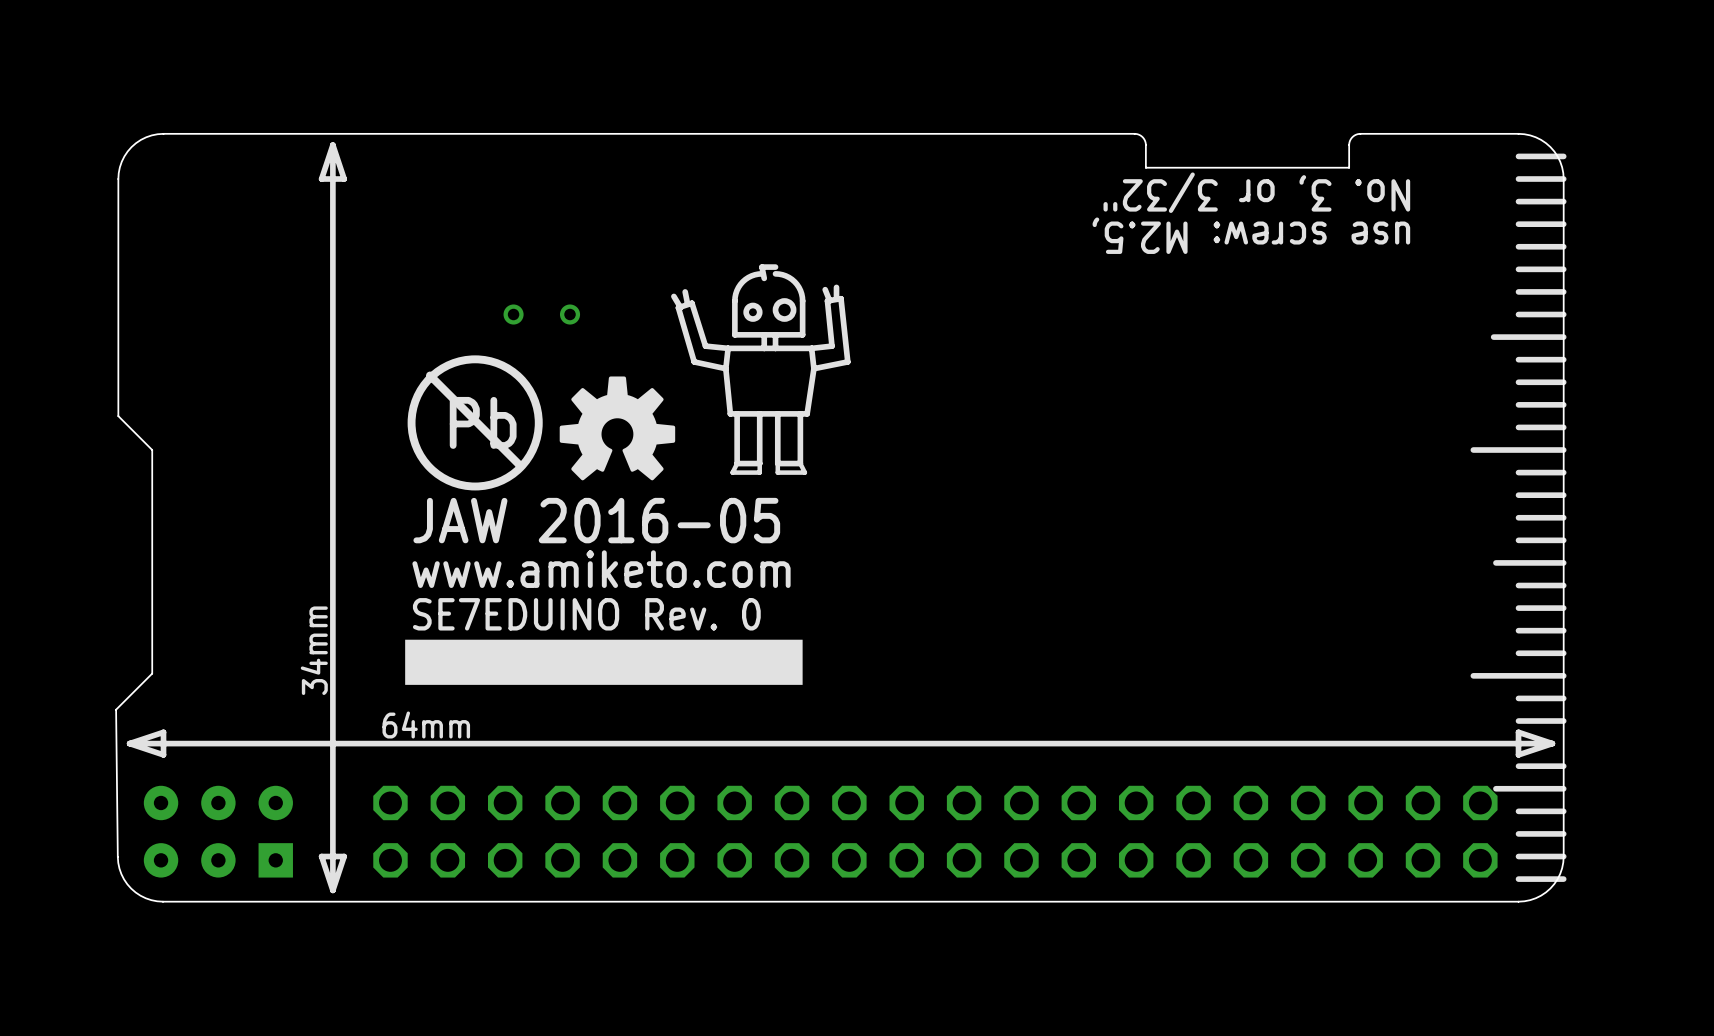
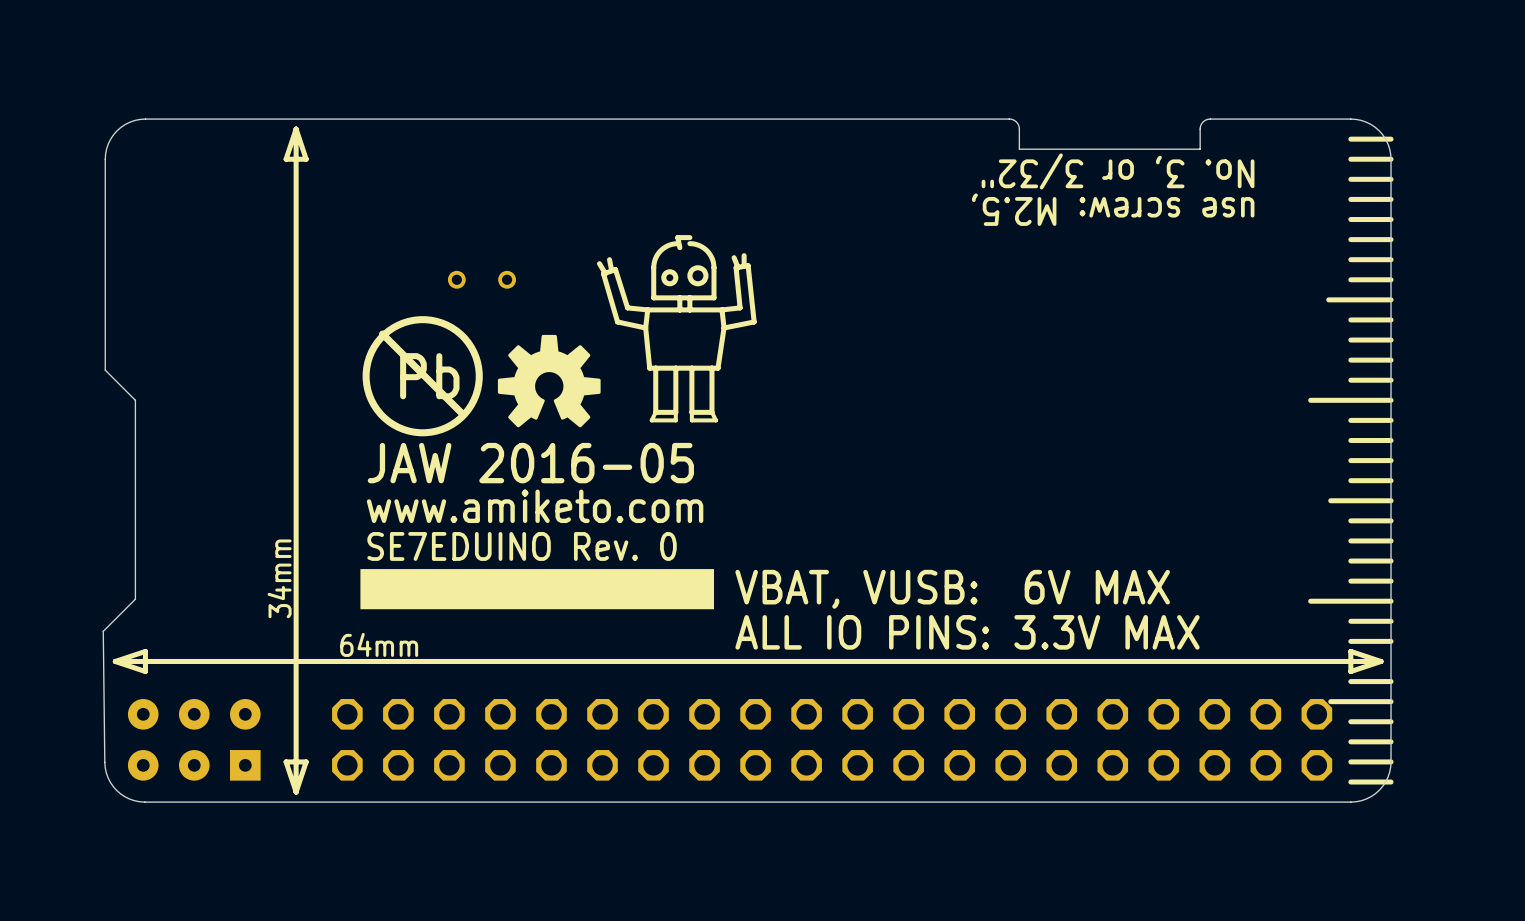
text: none -> VBAT, VUSB: 6V MAX (952, 589)
text: none -> ALL IO PINS: 3.3V MAX (967, 632)

